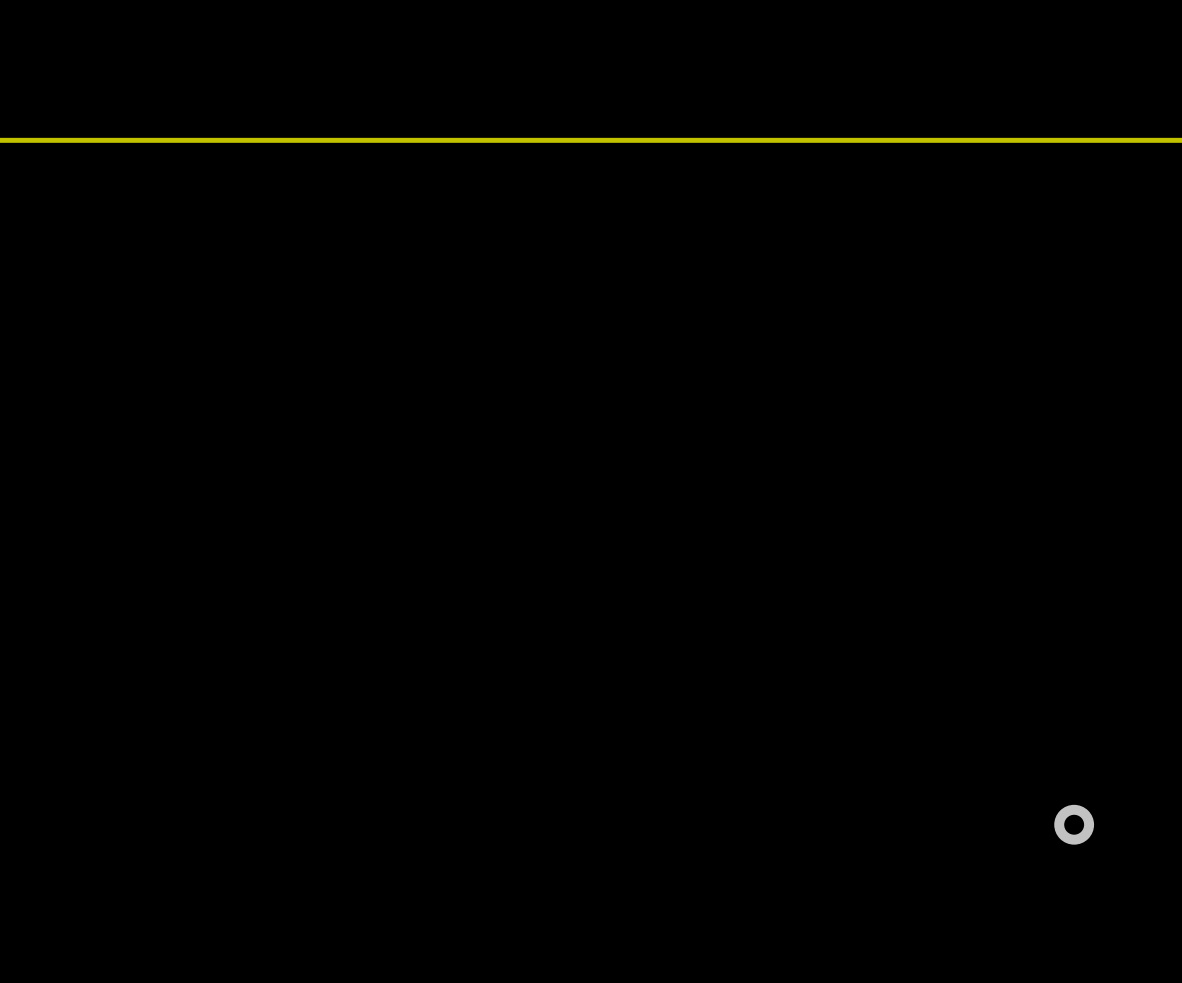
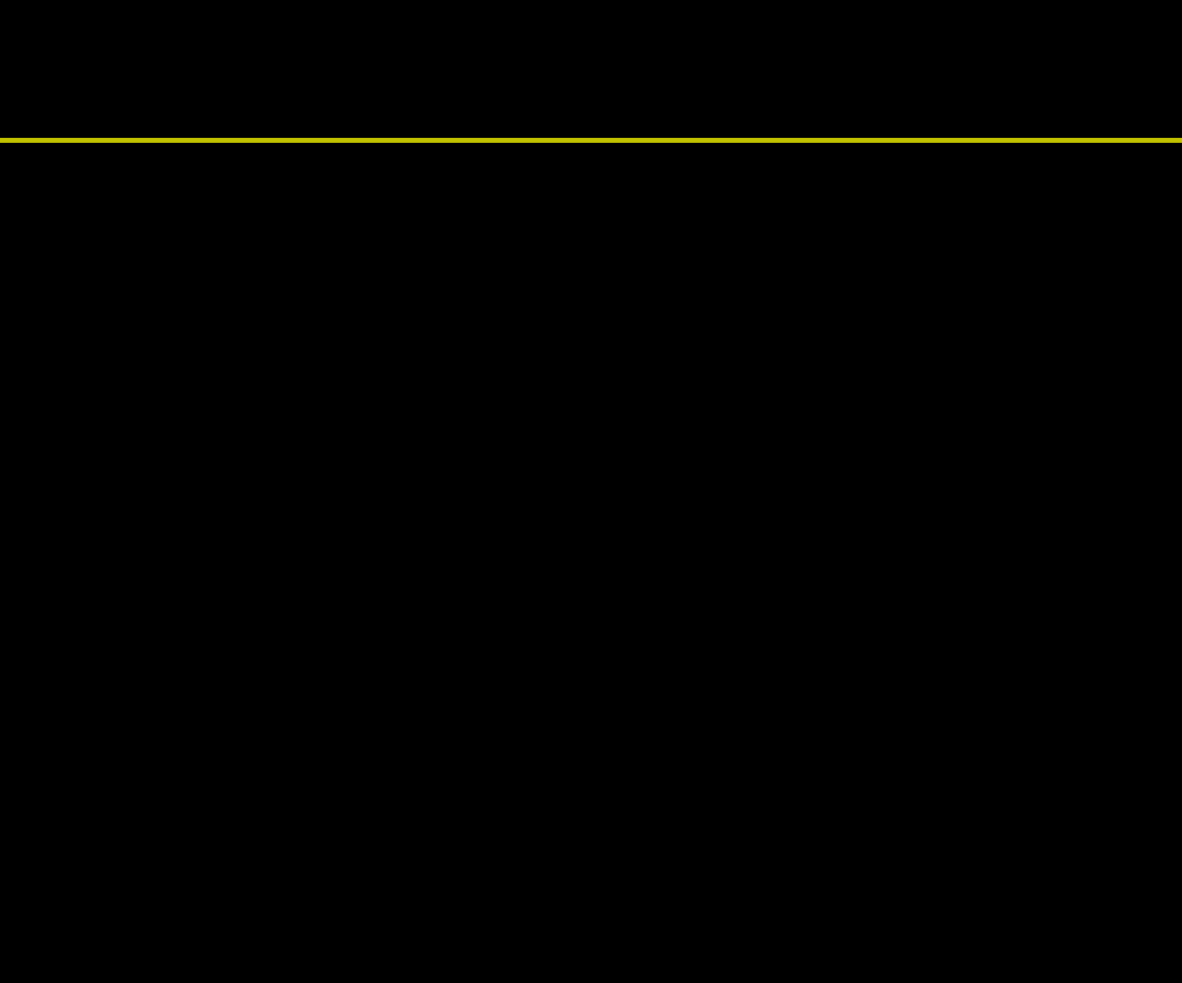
via: (1074, 824) -> none

